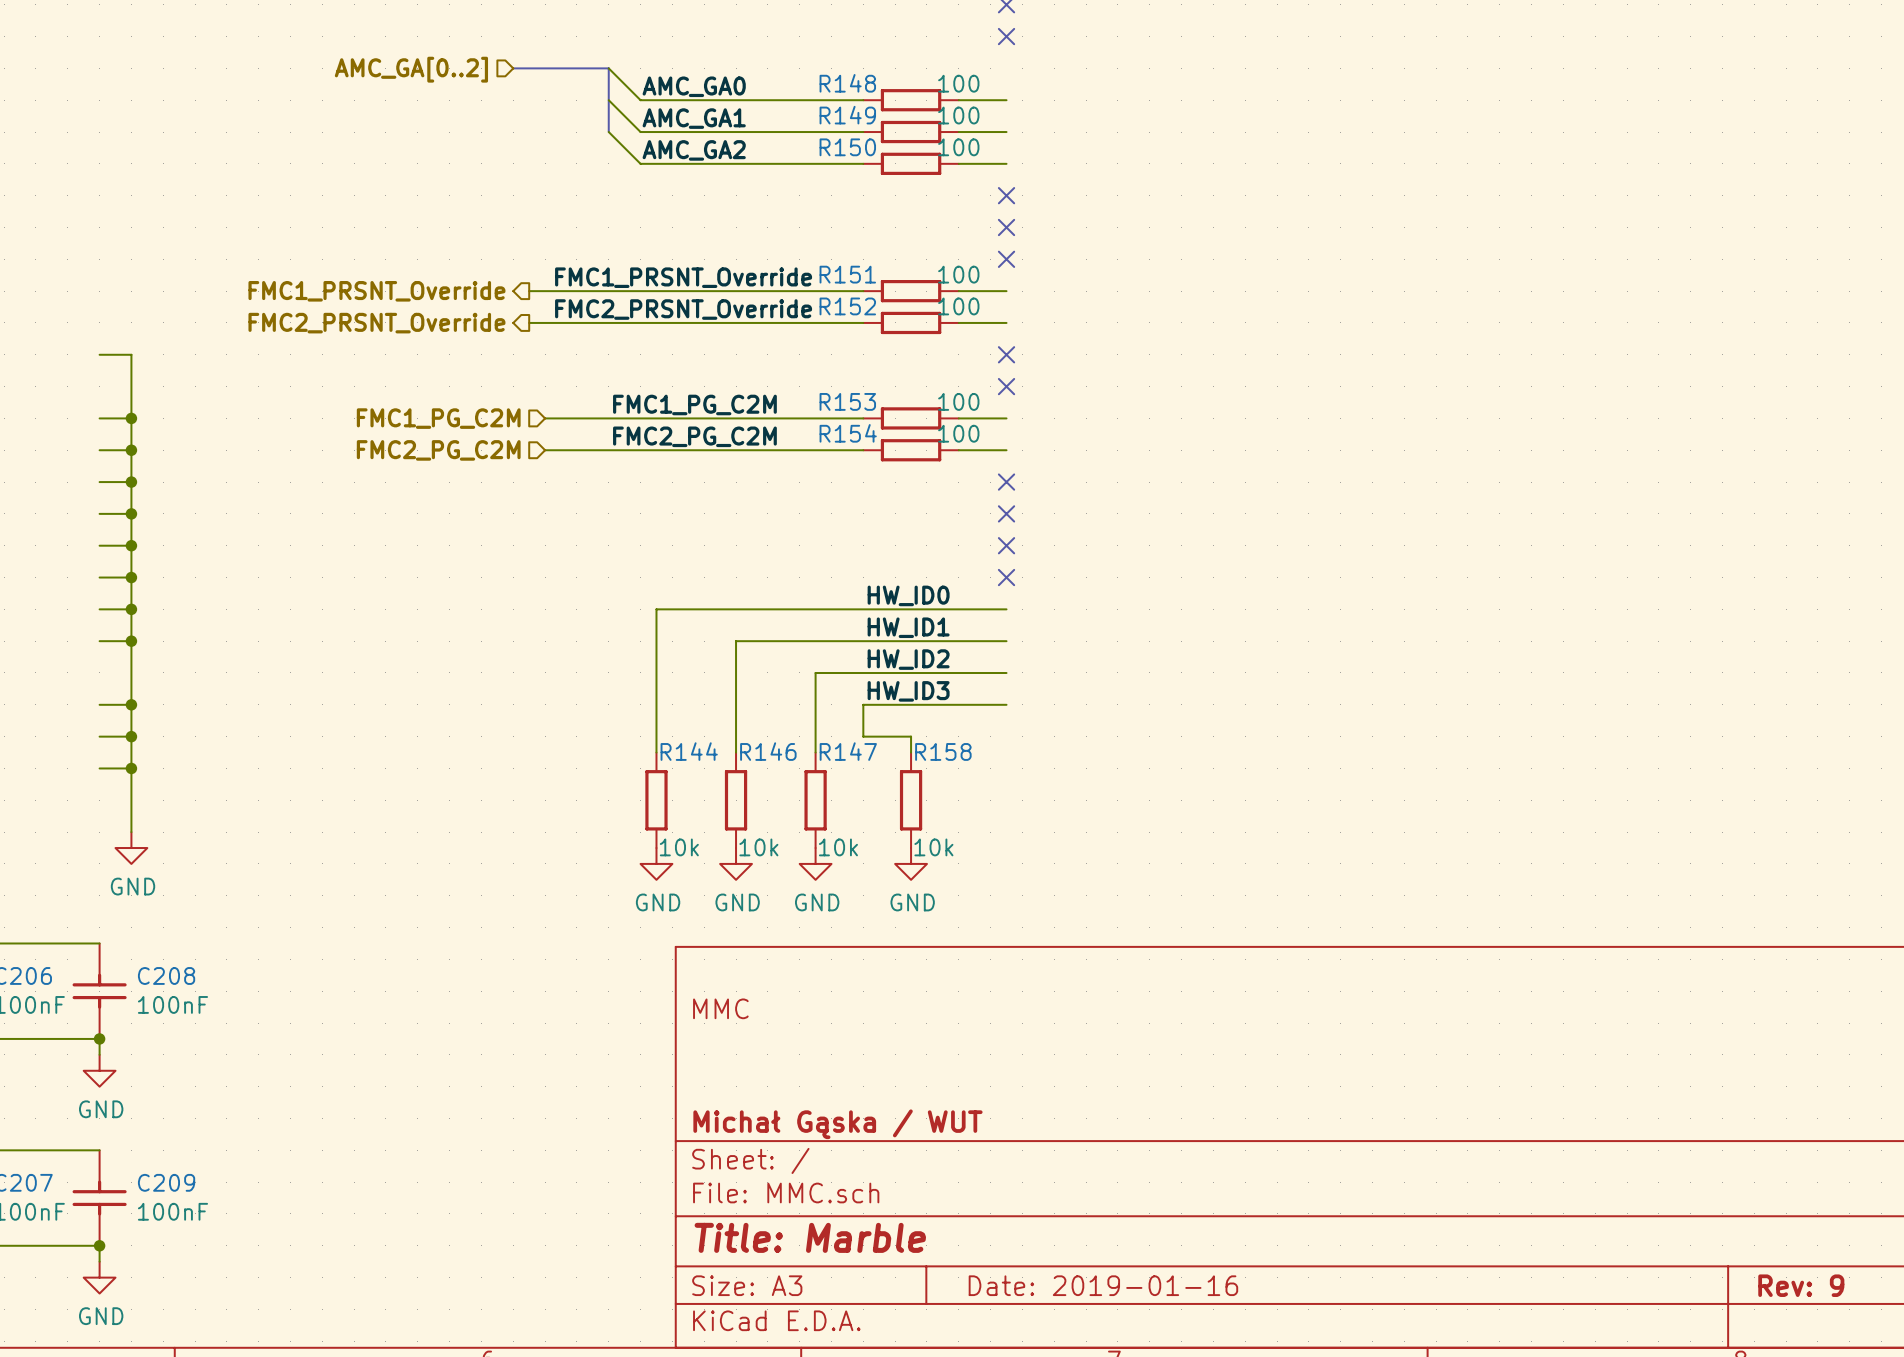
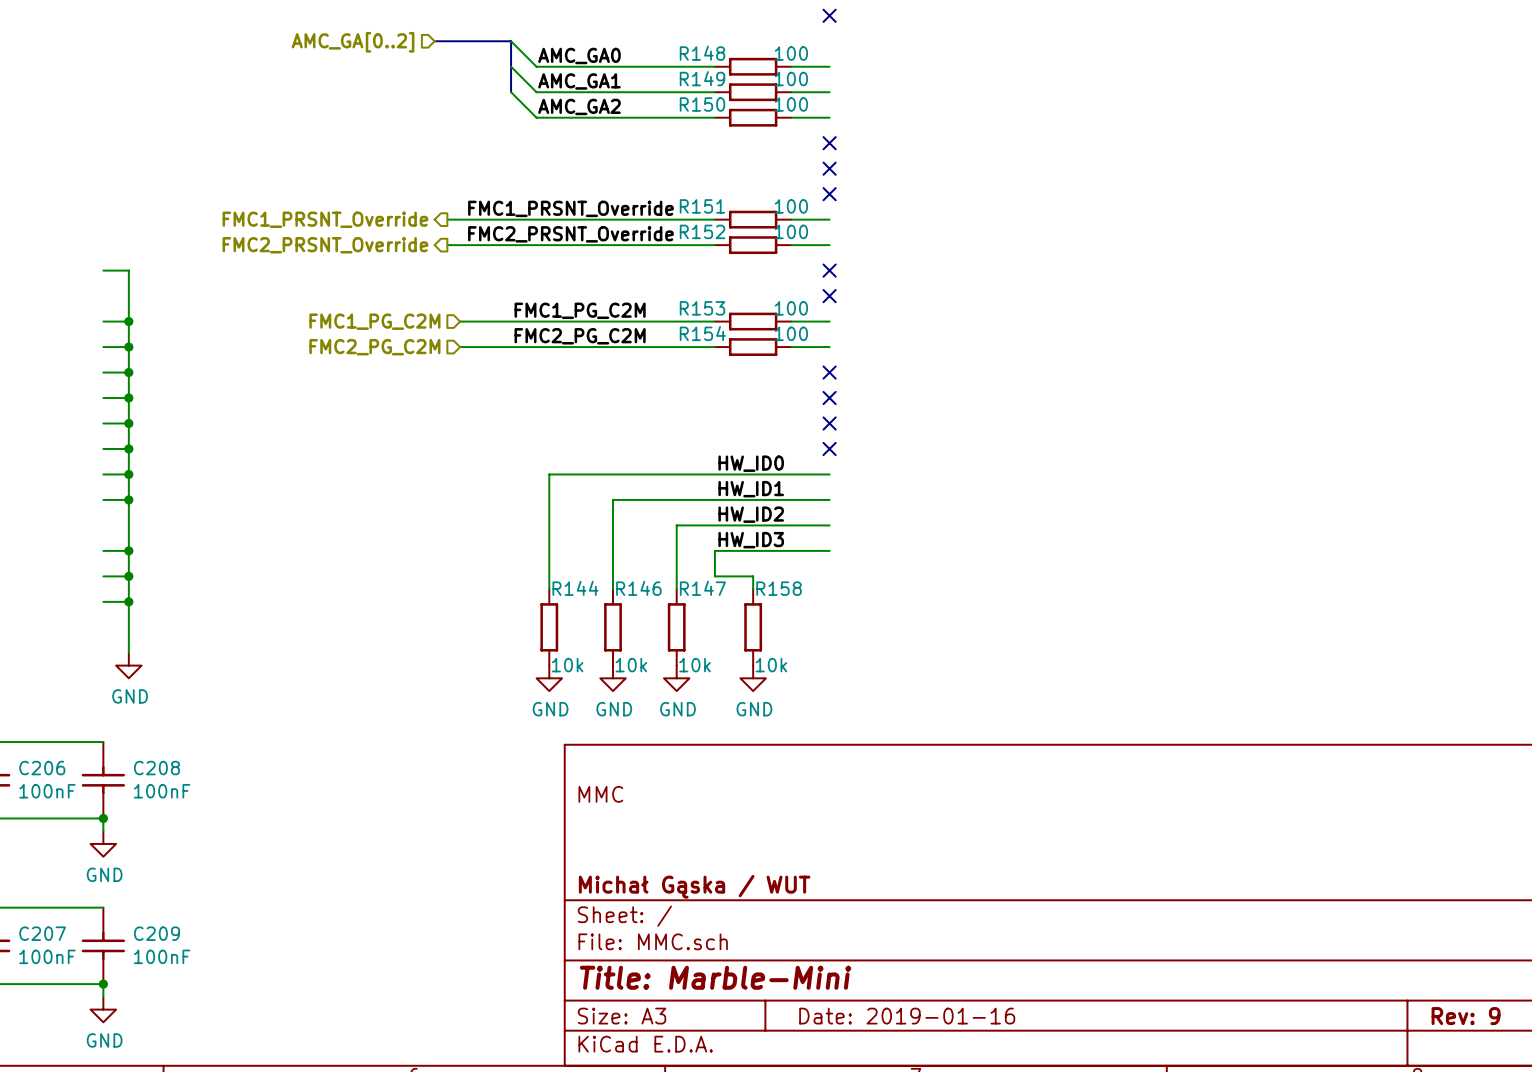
title block: Title: Marble (810, 1237) -> Title: Marble-Mini (715, 977)

